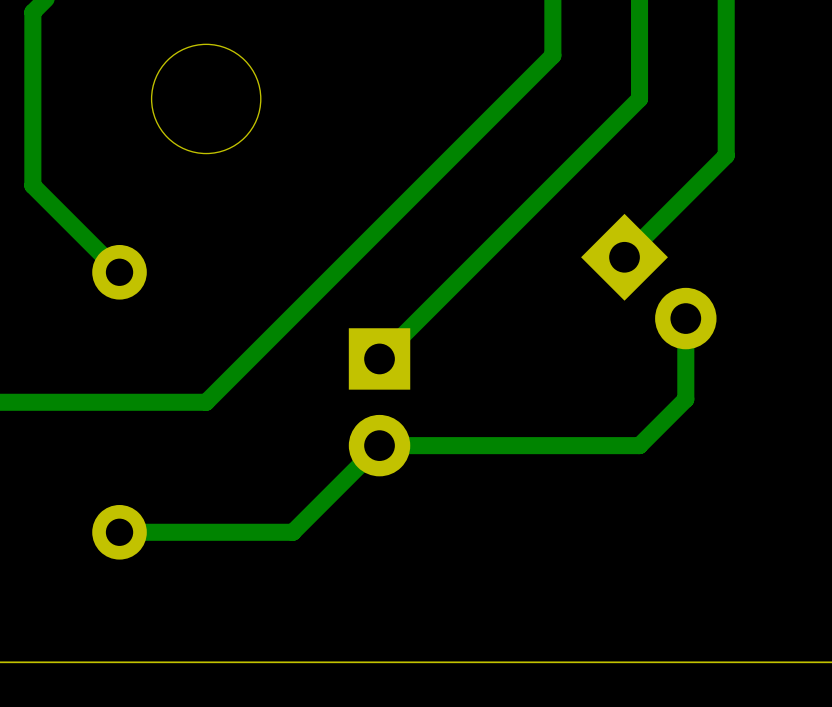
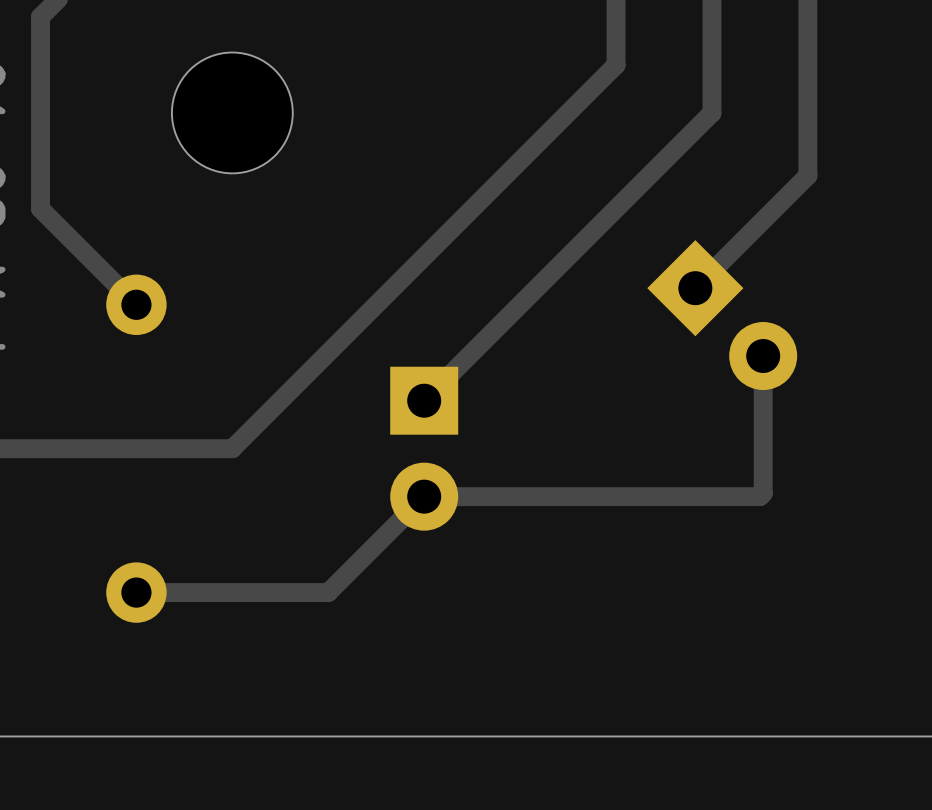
track: (685, 399) (639, 445) -> (763, 445) (763, 493) (759, 496) (711, 496)

